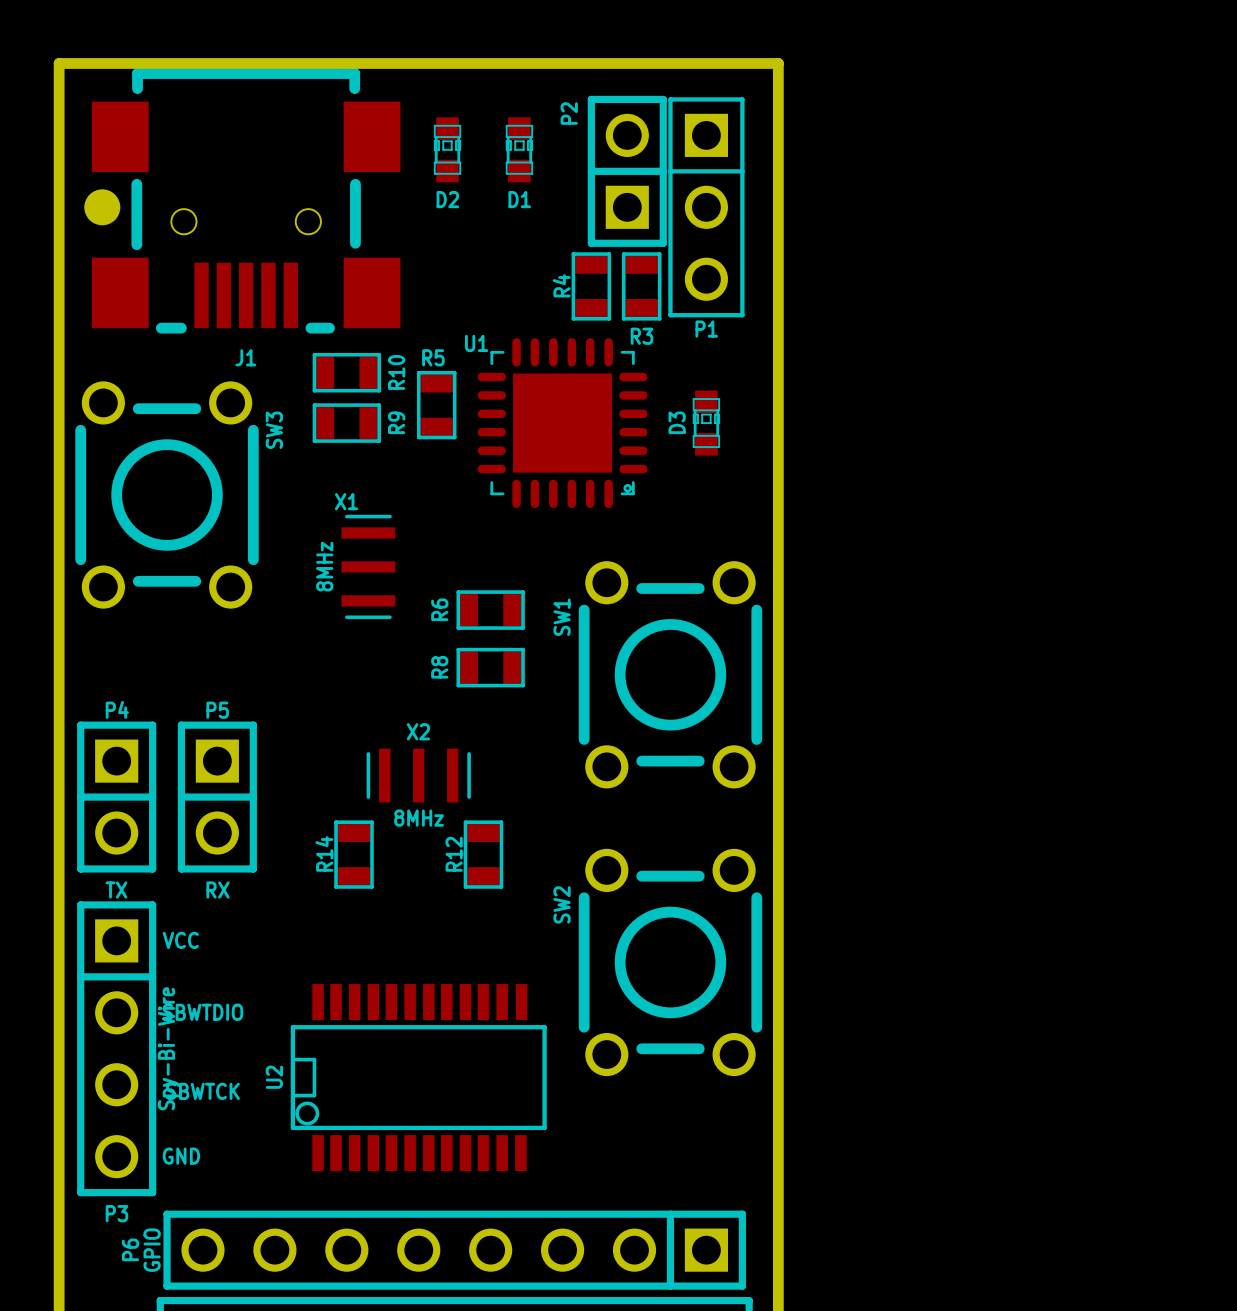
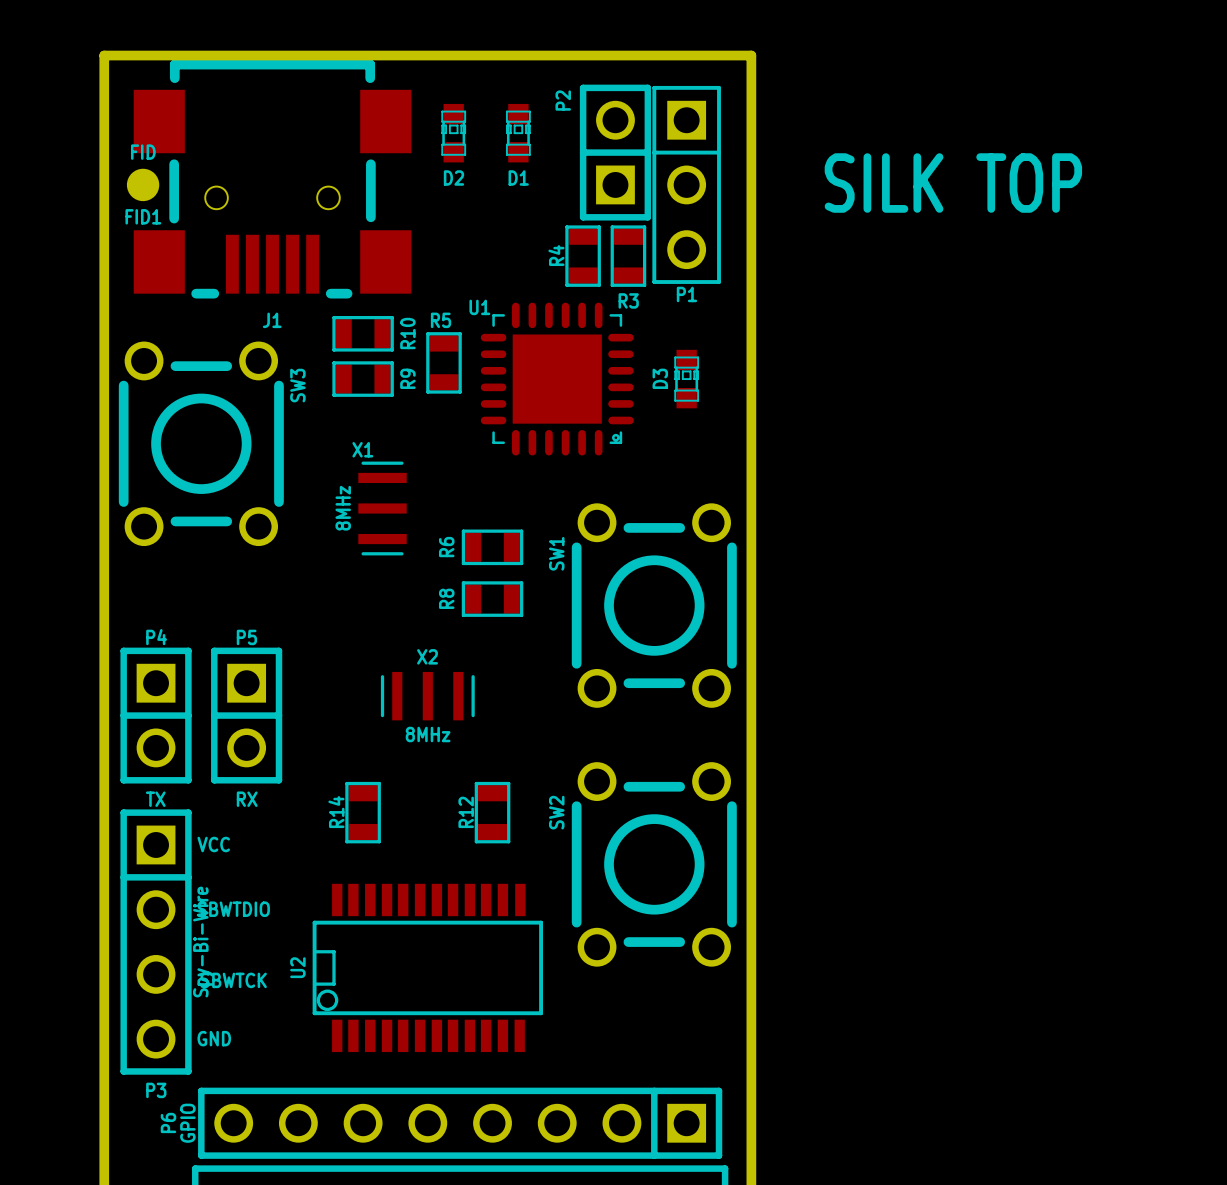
FID1 value: none -> FID (143, 152)
text: none -> SILK TOP (953, 183)
FID1 name: none -> FID1 (143, 216)
R14 position: (354, 854) -> (363, 812)
R12 position: (483, 854) -> (492, 812)

